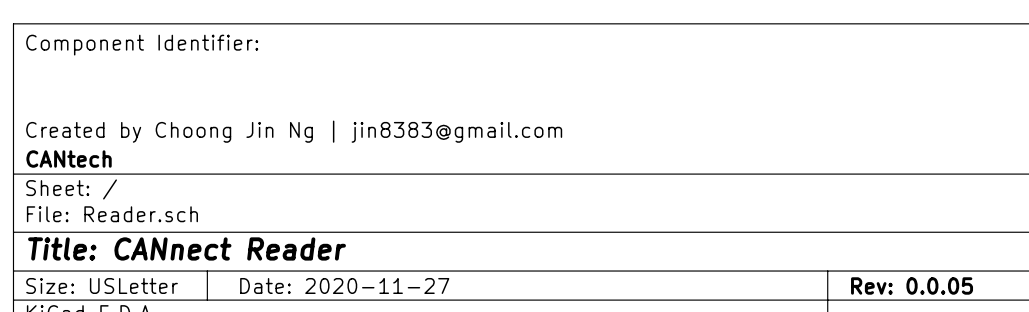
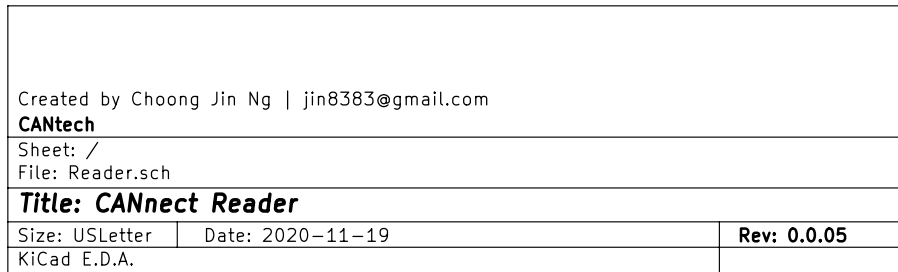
title block: Component Identifier: (142, 45) -> none
title block: Date: 2020-11-27 (344, 285) -> Date: 2020-11-19 (296, 234)

